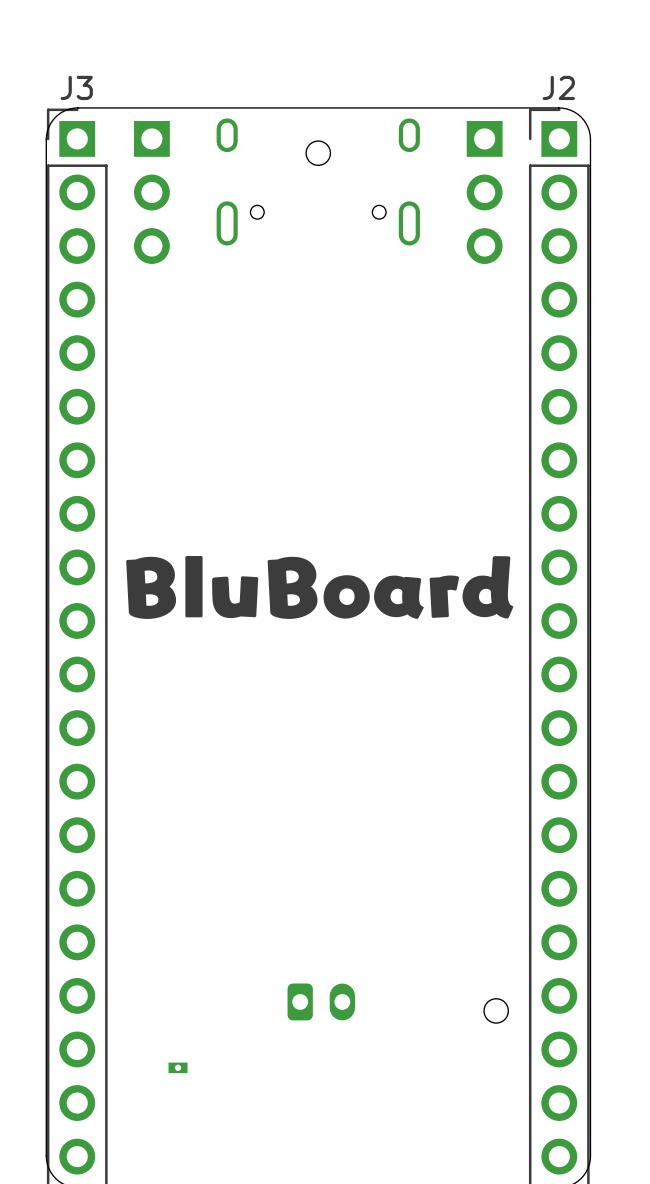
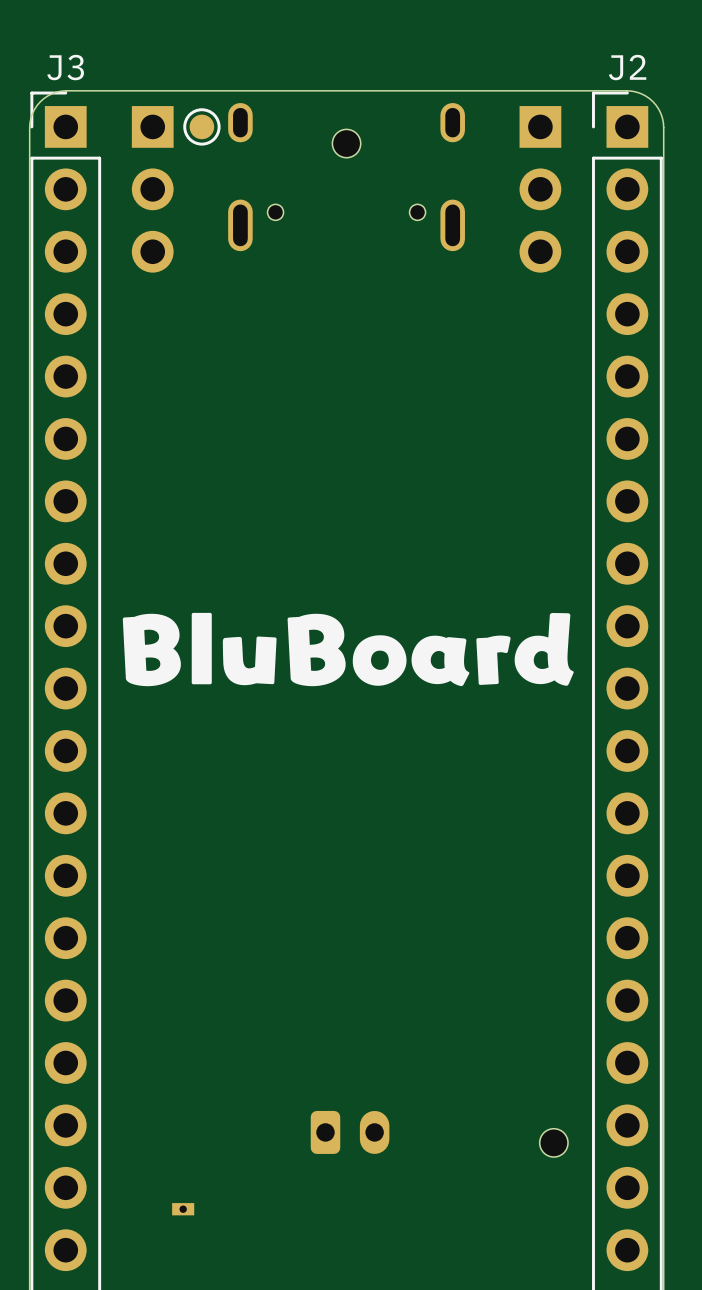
part: none -> (201, 126)

